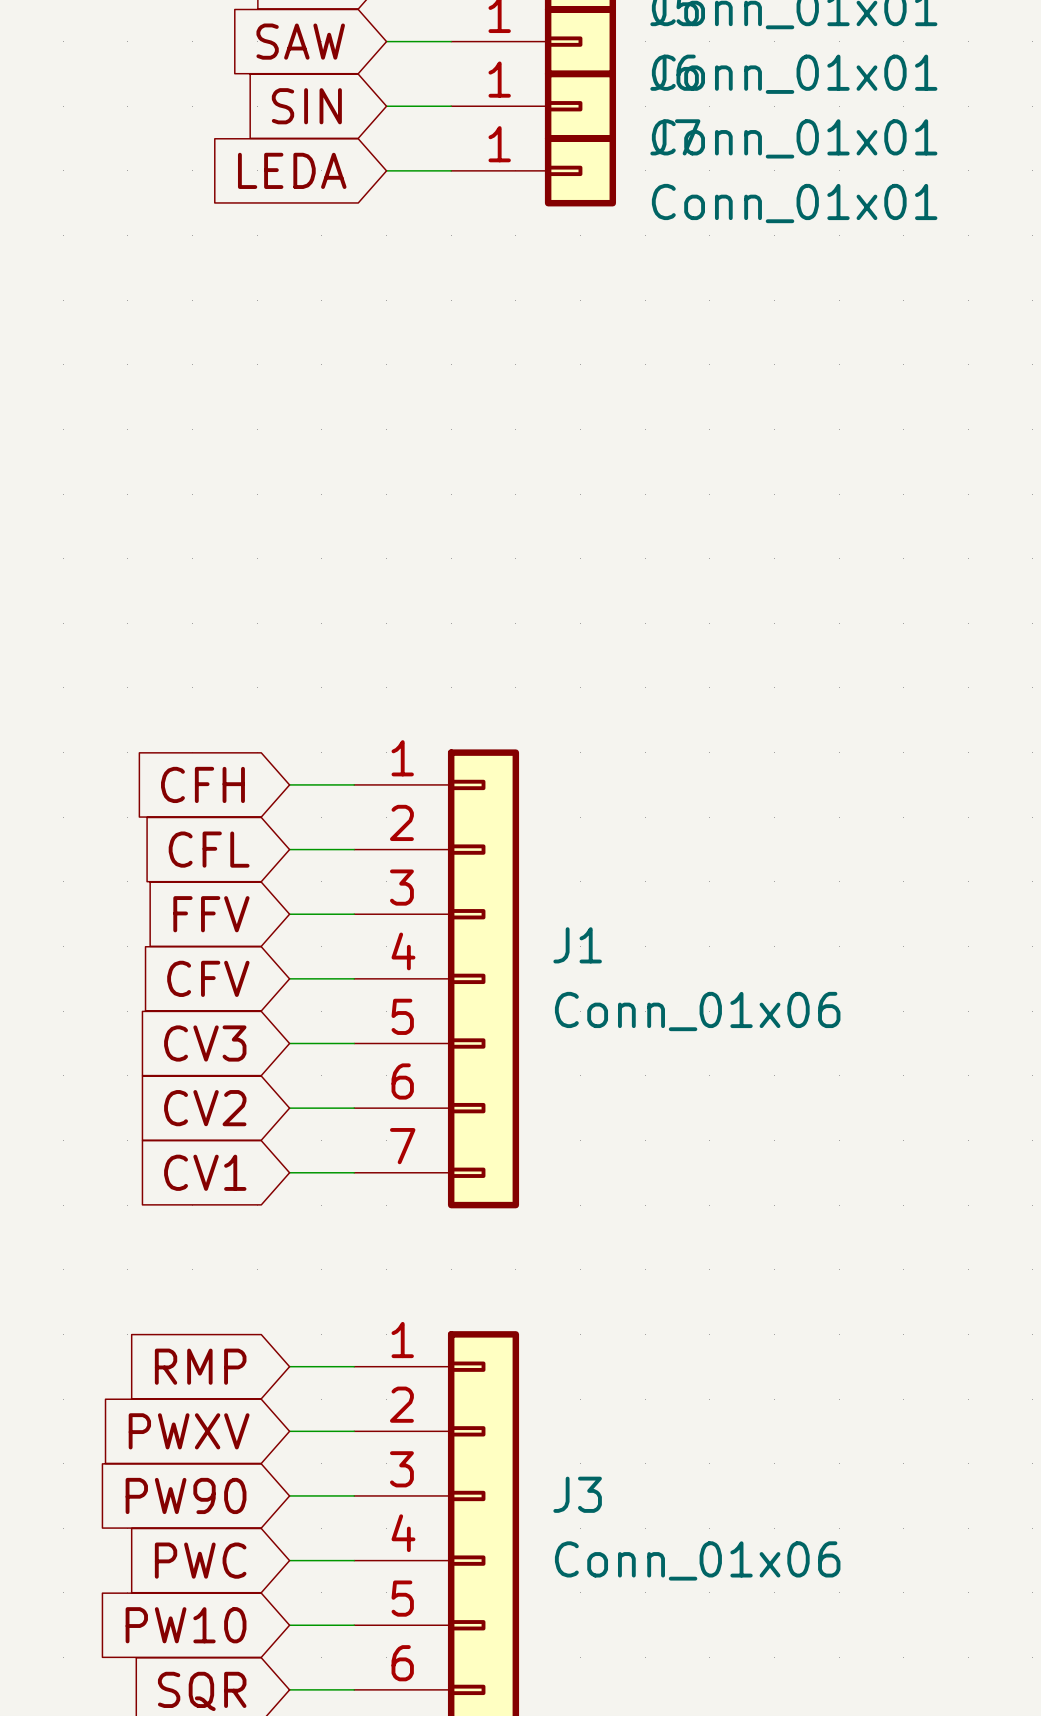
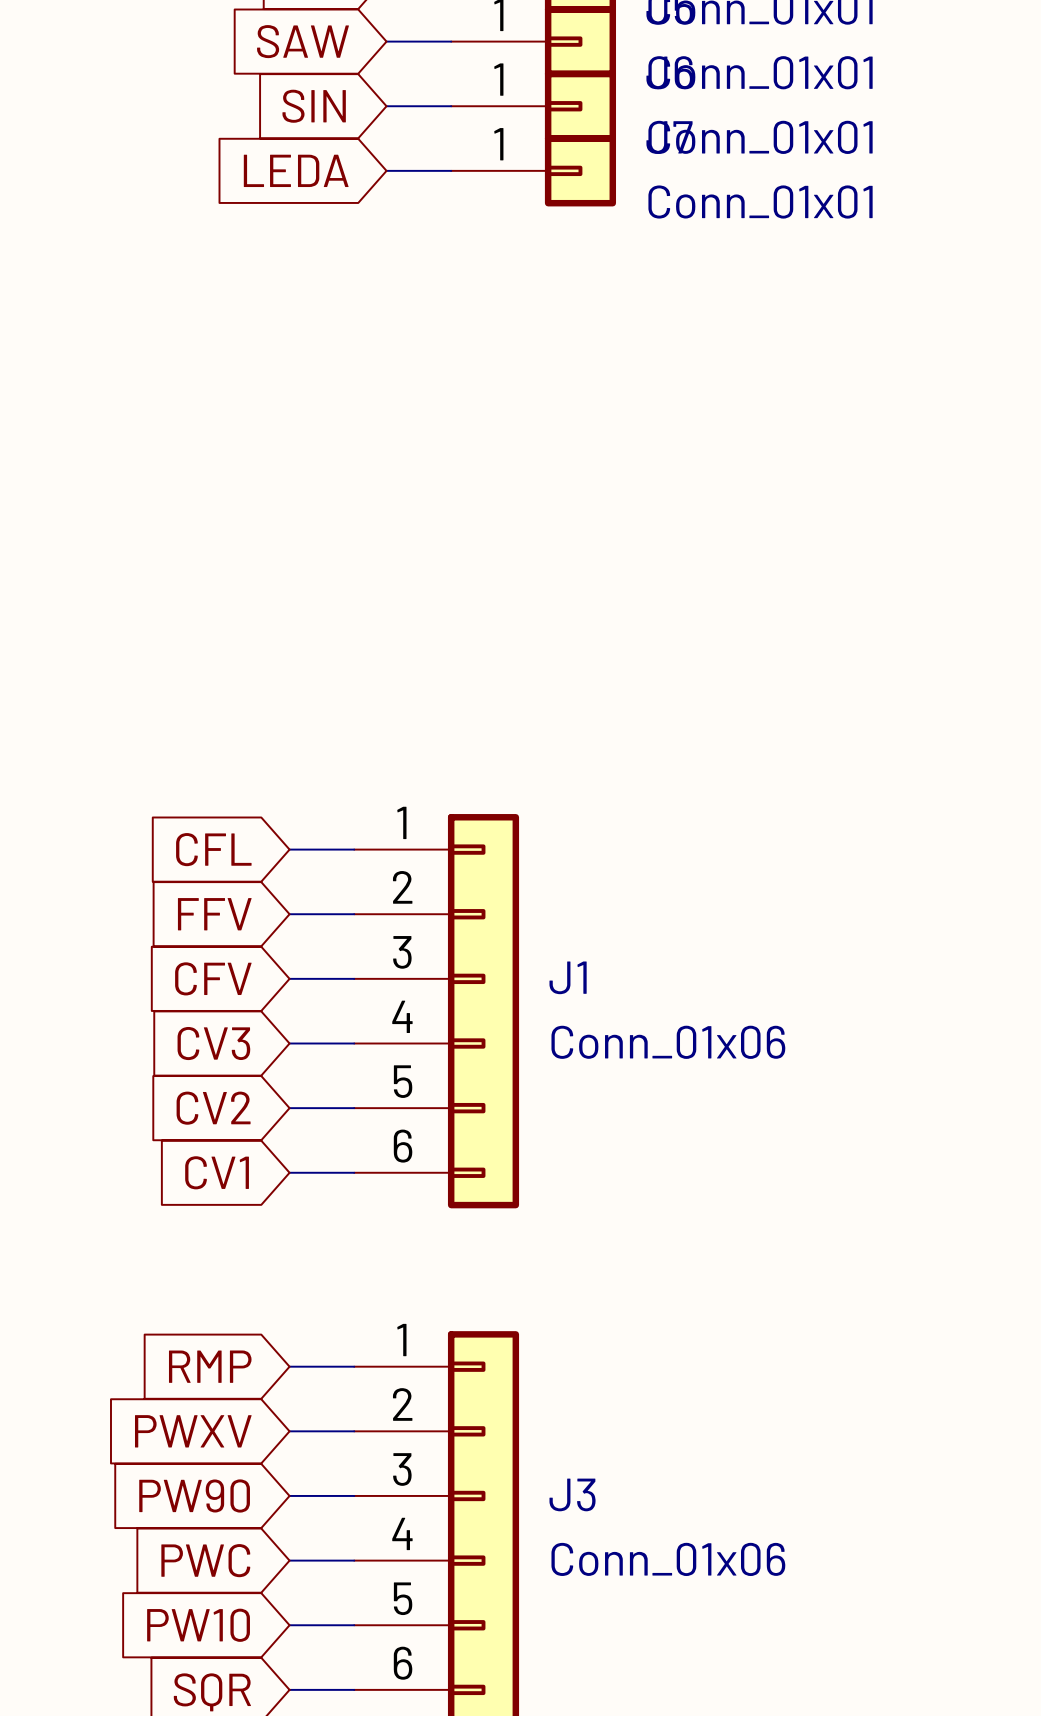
J1 symbol: [354, 749, 520, 1209] -> [354, 814, 520, 1209]
global label: CFH (202, 784) -> none
wire: (289, 784) (354, 784) -> none

